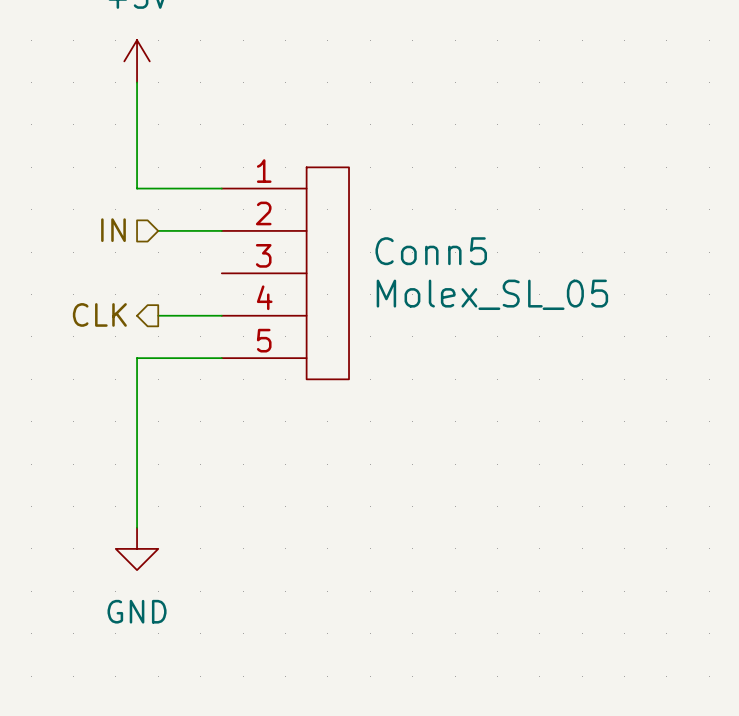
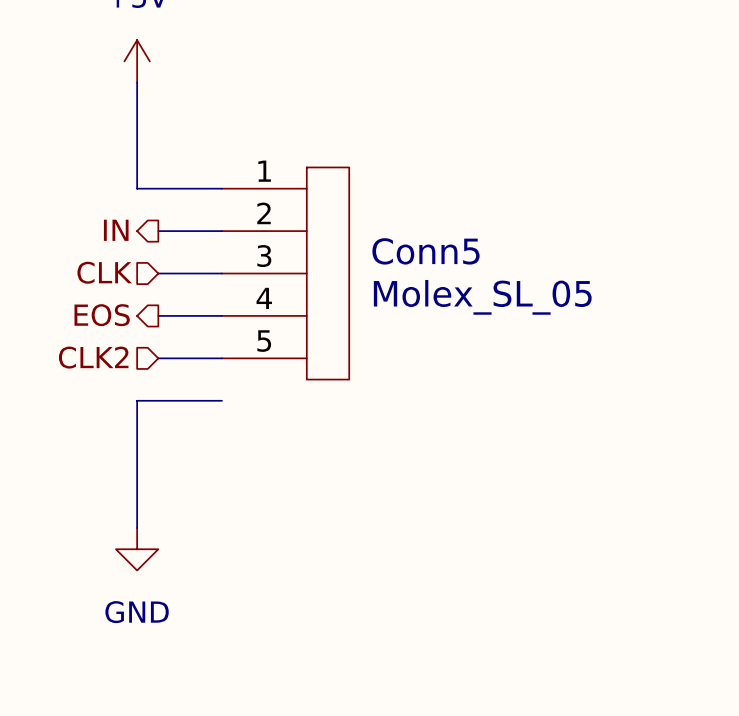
hierarchical label shape: input (113, 230) -> output (116, 230)
hierarchical label: none -> CLK (104, 272)
wire: none -> (158, 273) (221, 273)
hierarchical label: CLK (99, 314) -> EOS (102, 315)
hierarchical label: none -> CLK2 (93, 357)
wire: (158, 358) (137, 358) (137, 400) -> (221, 400) (137, 400)

